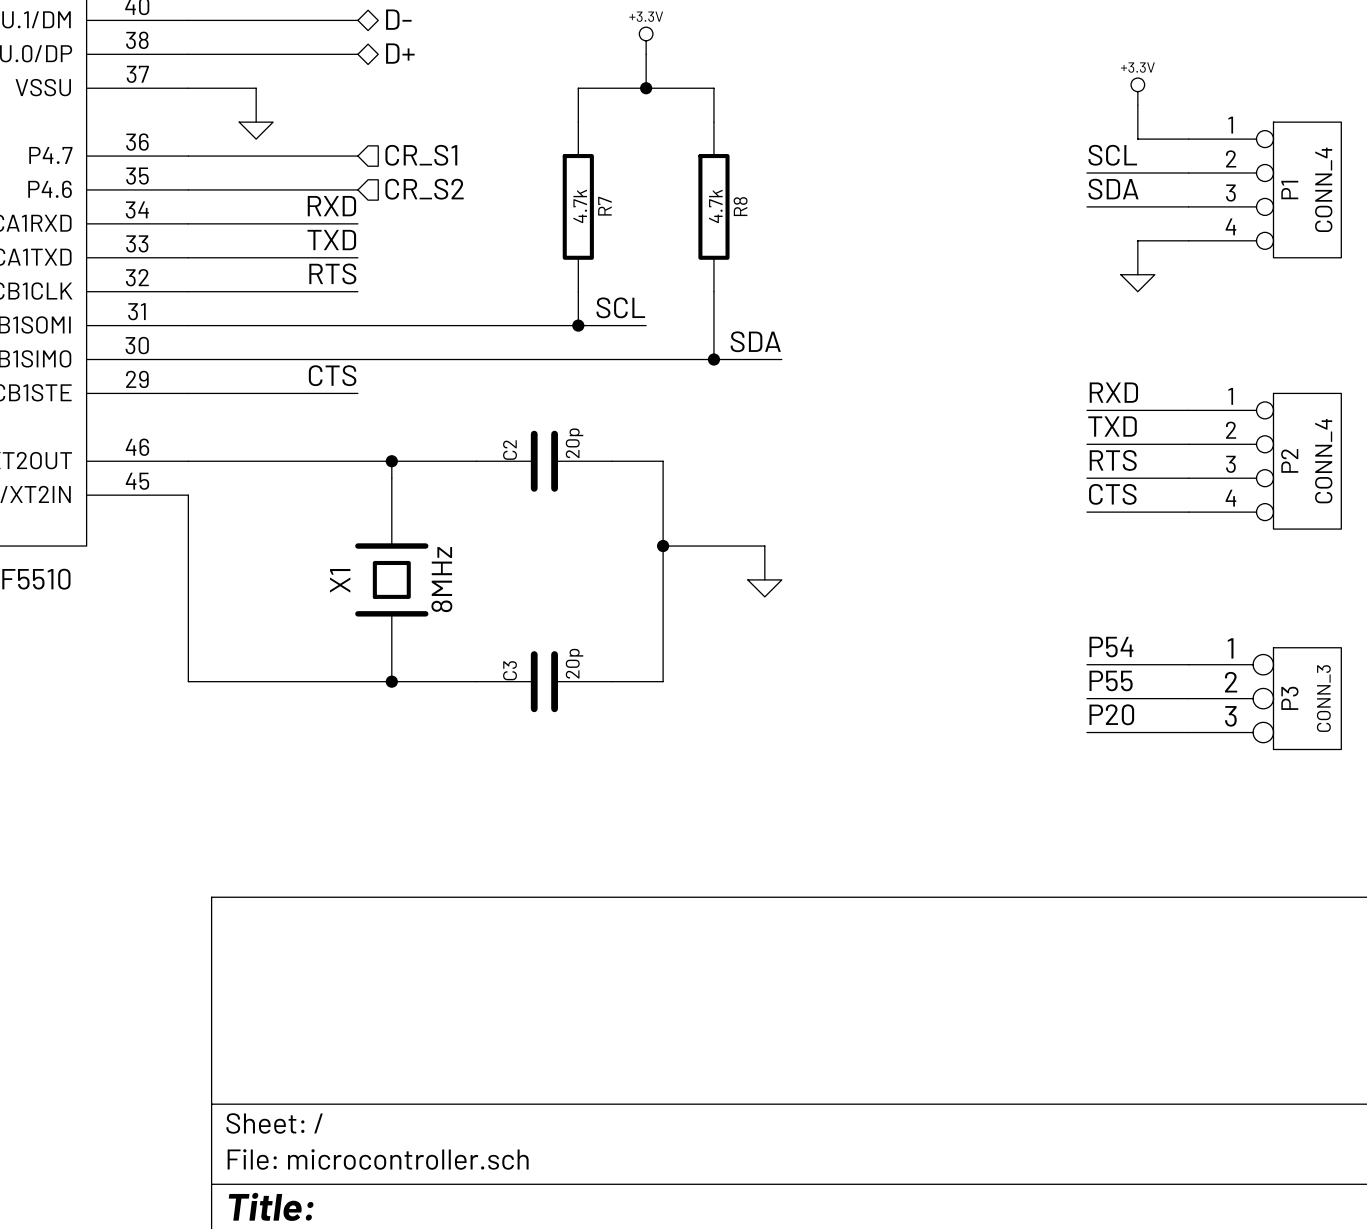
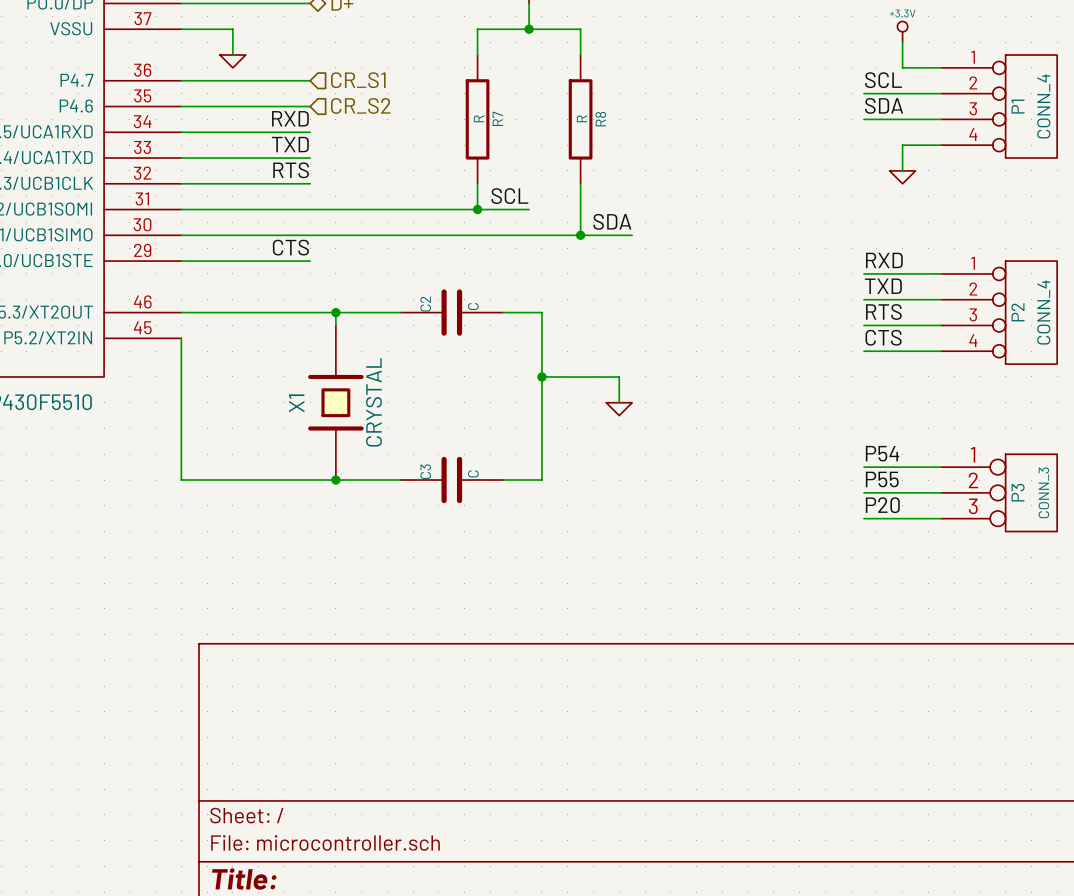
R7 value: 4.7k (580, 206) -> R (478, 118)
R8 value: 4.7k (715, 206) -> R (582, 118)
C2 value: 20p (574, 443) -> C (473, 306)
X1 value: 8MHz (441, 579) -> CRYSTAL (373, 402)
C3 value: 20p (574, 663) -> C (473, 473)

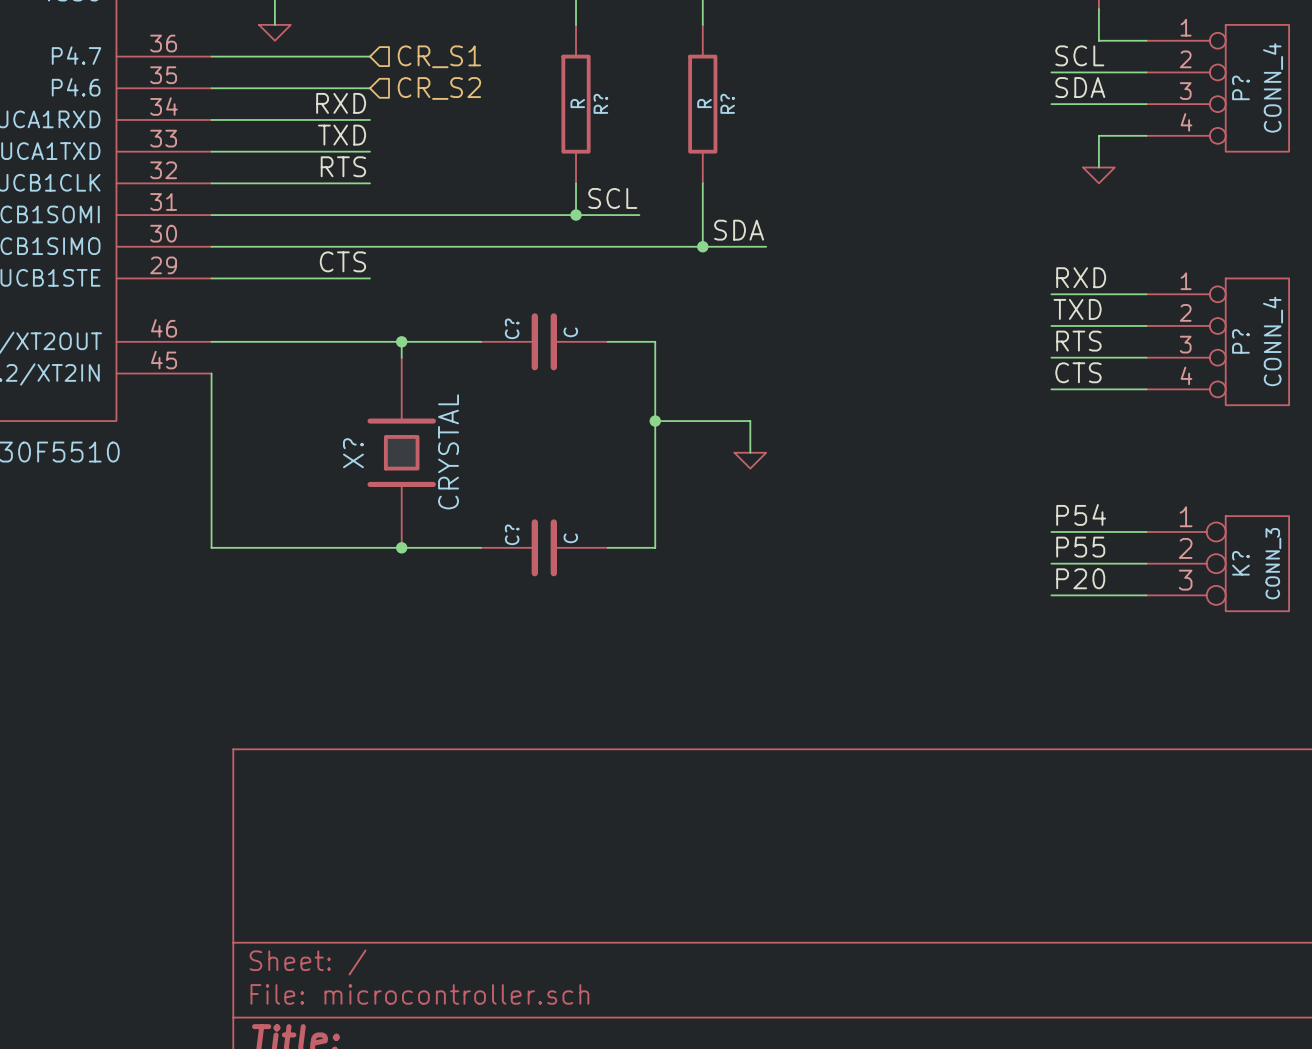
P1 name: P1 (1018, 106) -> P? (1240, 87)
R7 name: R7 (497, 118) -> R? (600, 103)
R8 name: R8 (600, 119) -> R? (727, 103)
C2 name: C2 (425, 304) -> C? (512, 328)
P2 name: P2 (1017, 312) -> P? (1240, 341)
X1 name: X1 (296, 403) -> X? (353, 453)
C3 name: C3 (425, 471) -> C? (512, 534)
P3 name: P3 (1018, 492) -> K? (1240, 563)

